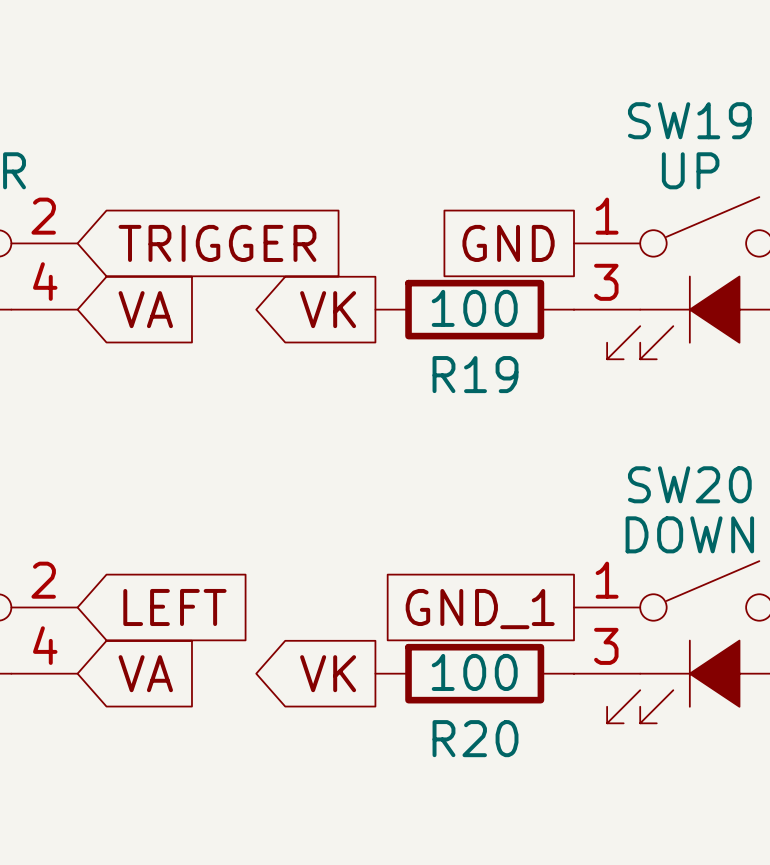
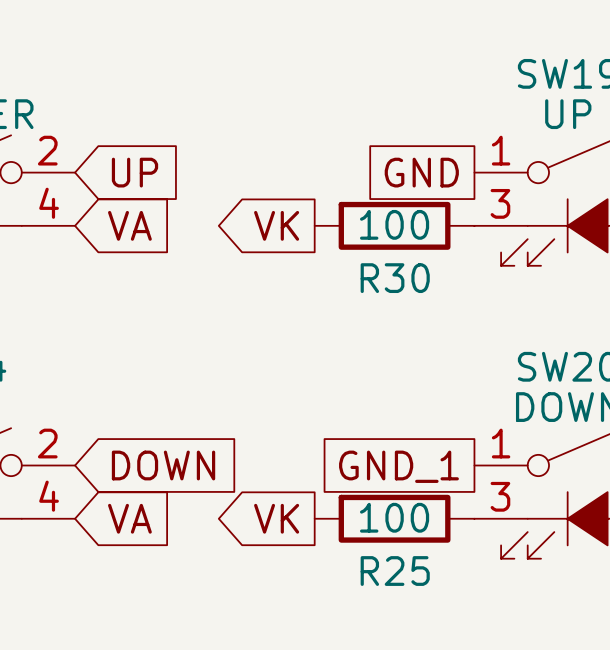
global label: TRIGGER (217, 243) -> UP (134, 172)
R19 name: R19 (475, 374) -> R30 (395, 278)
global label: LEFT (174, 607) -> DOWN (163, 465)
R20 name: R20 (475, 738) -> R25 (395, 571)

